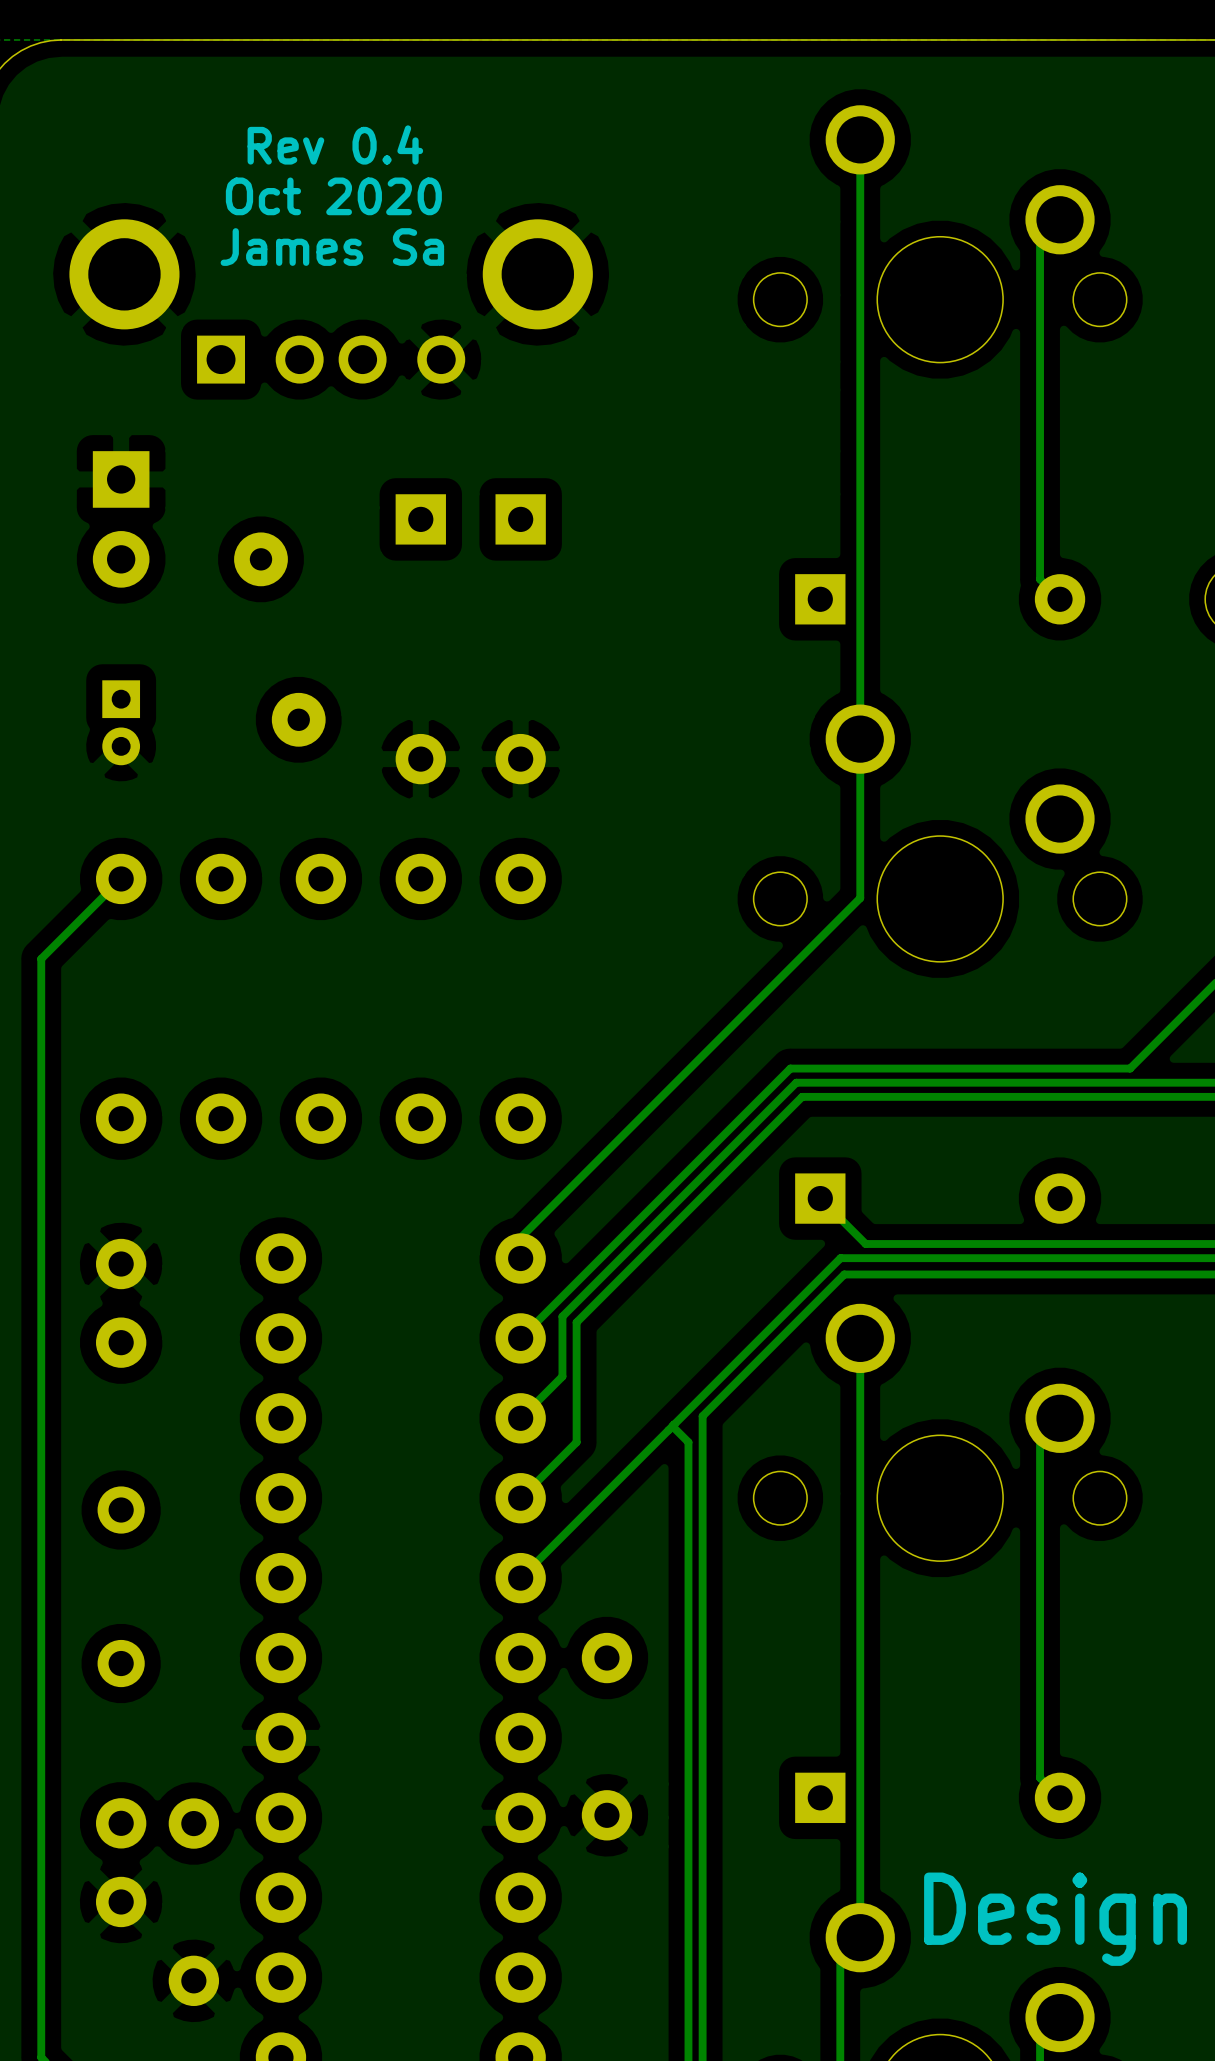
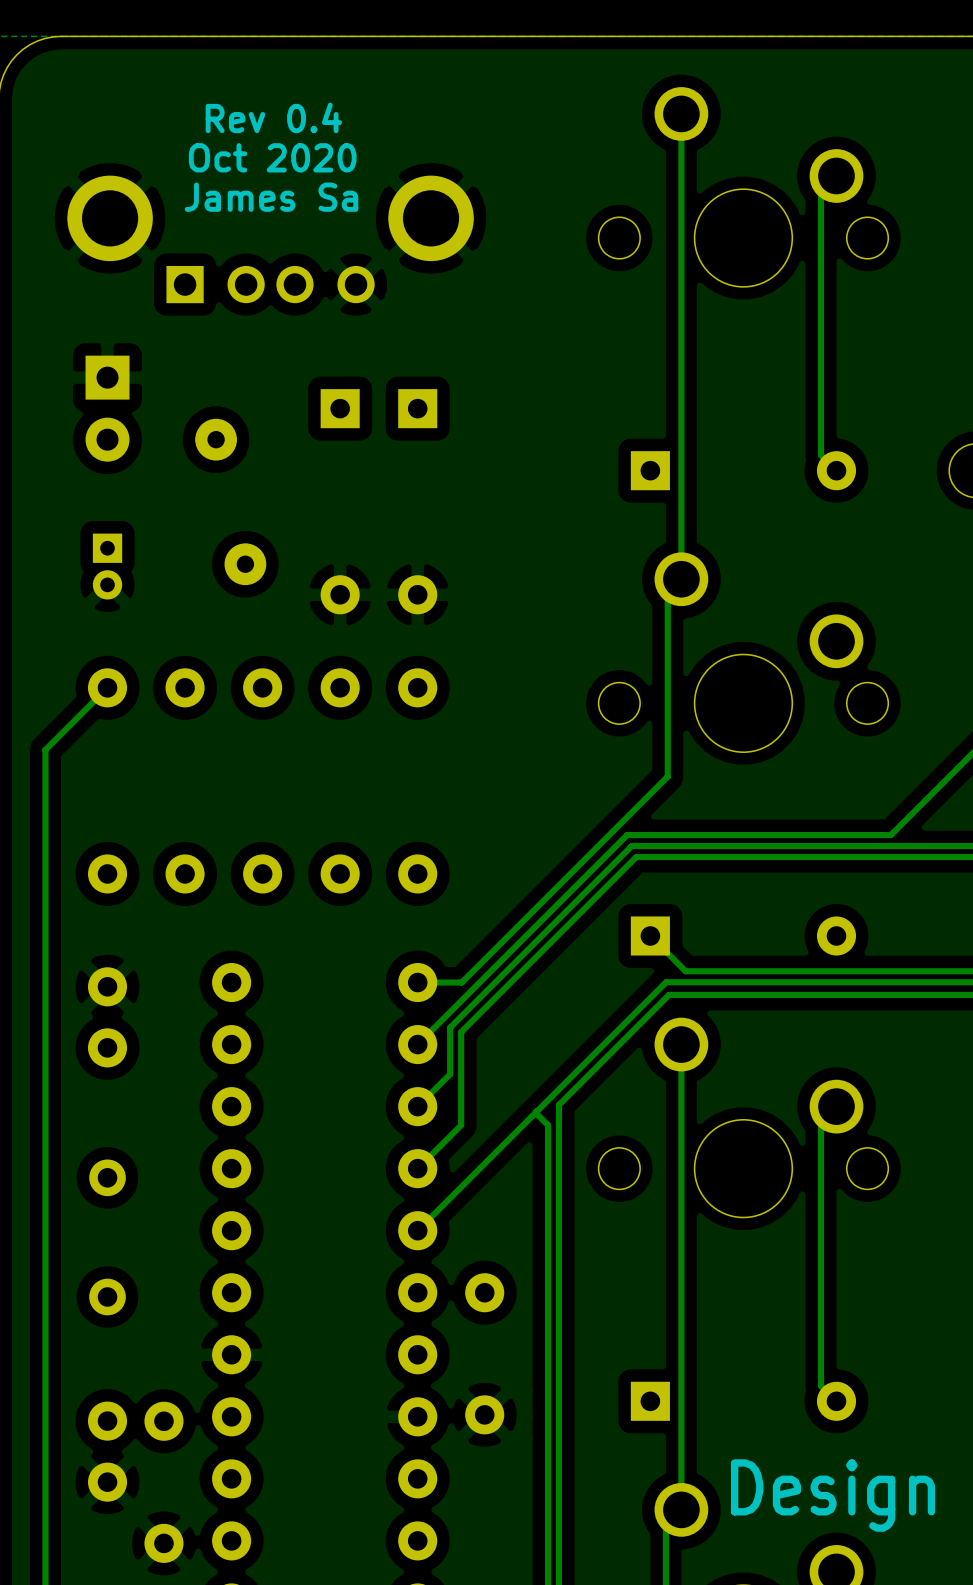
track: (860, 739) (860, 898) (520, 1237) (520, 1258) -> (681, 579) (667, 592) (667, 776) (461, 982) (417, 982)

